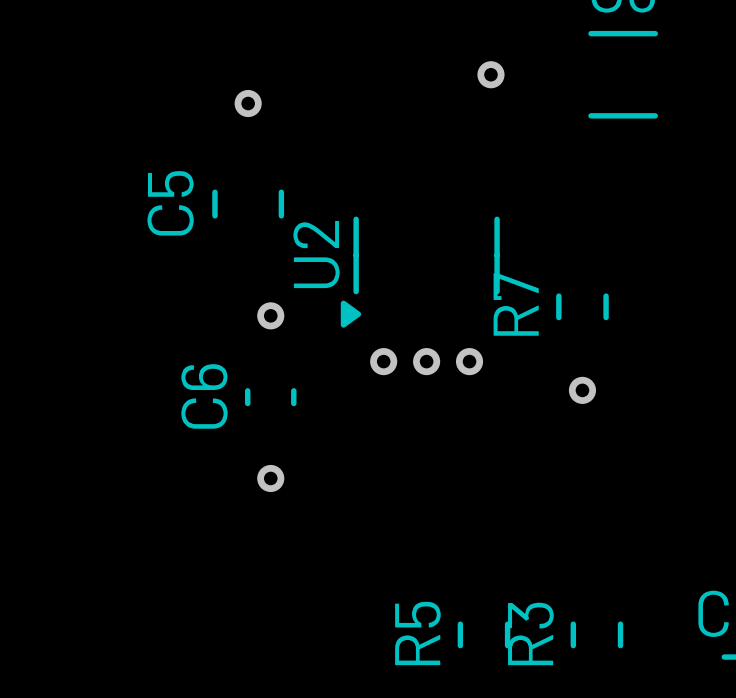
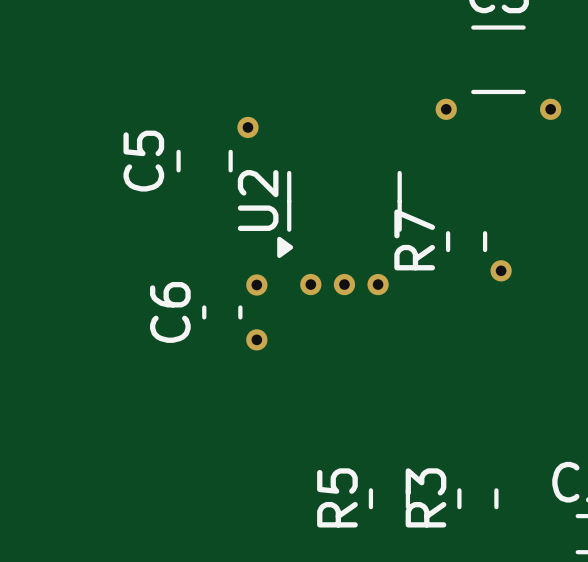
via position: (490, 74) -> (446, 109)
via: (248, 103) -> none
via: none -> (550, 109)
via: none -> (247, 127)
via: (270, 315) -> none
via: none -> (256, 284)
via position: (582, 390) -> (501, 270)
via: none -> (256, 339)
via: (270, 478) -> none

